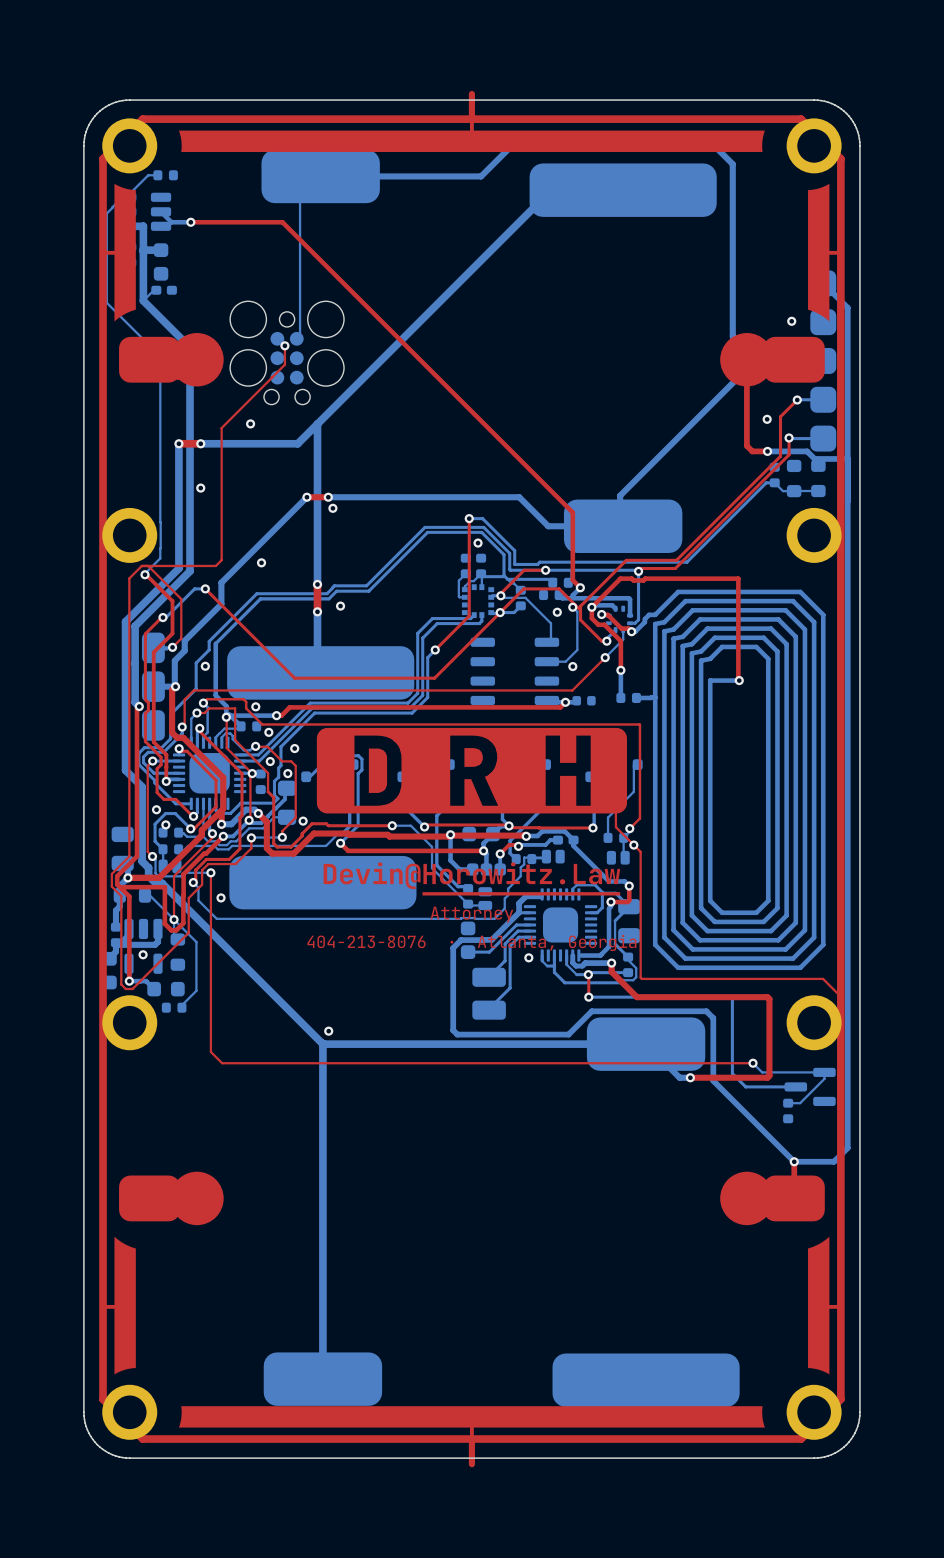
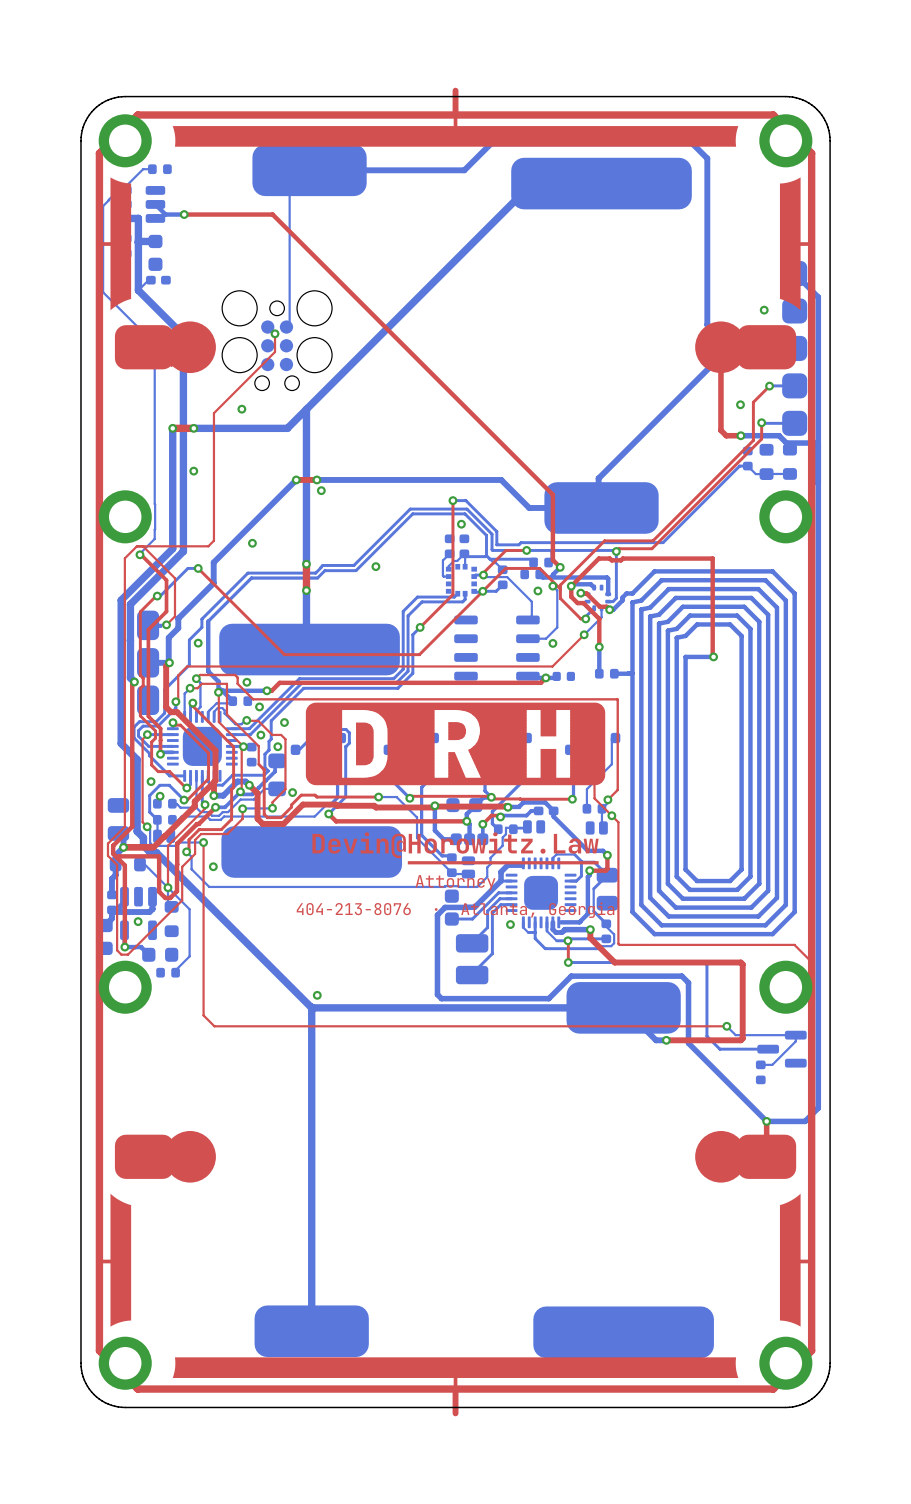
via position: (340, 606) -> (375, 566)

